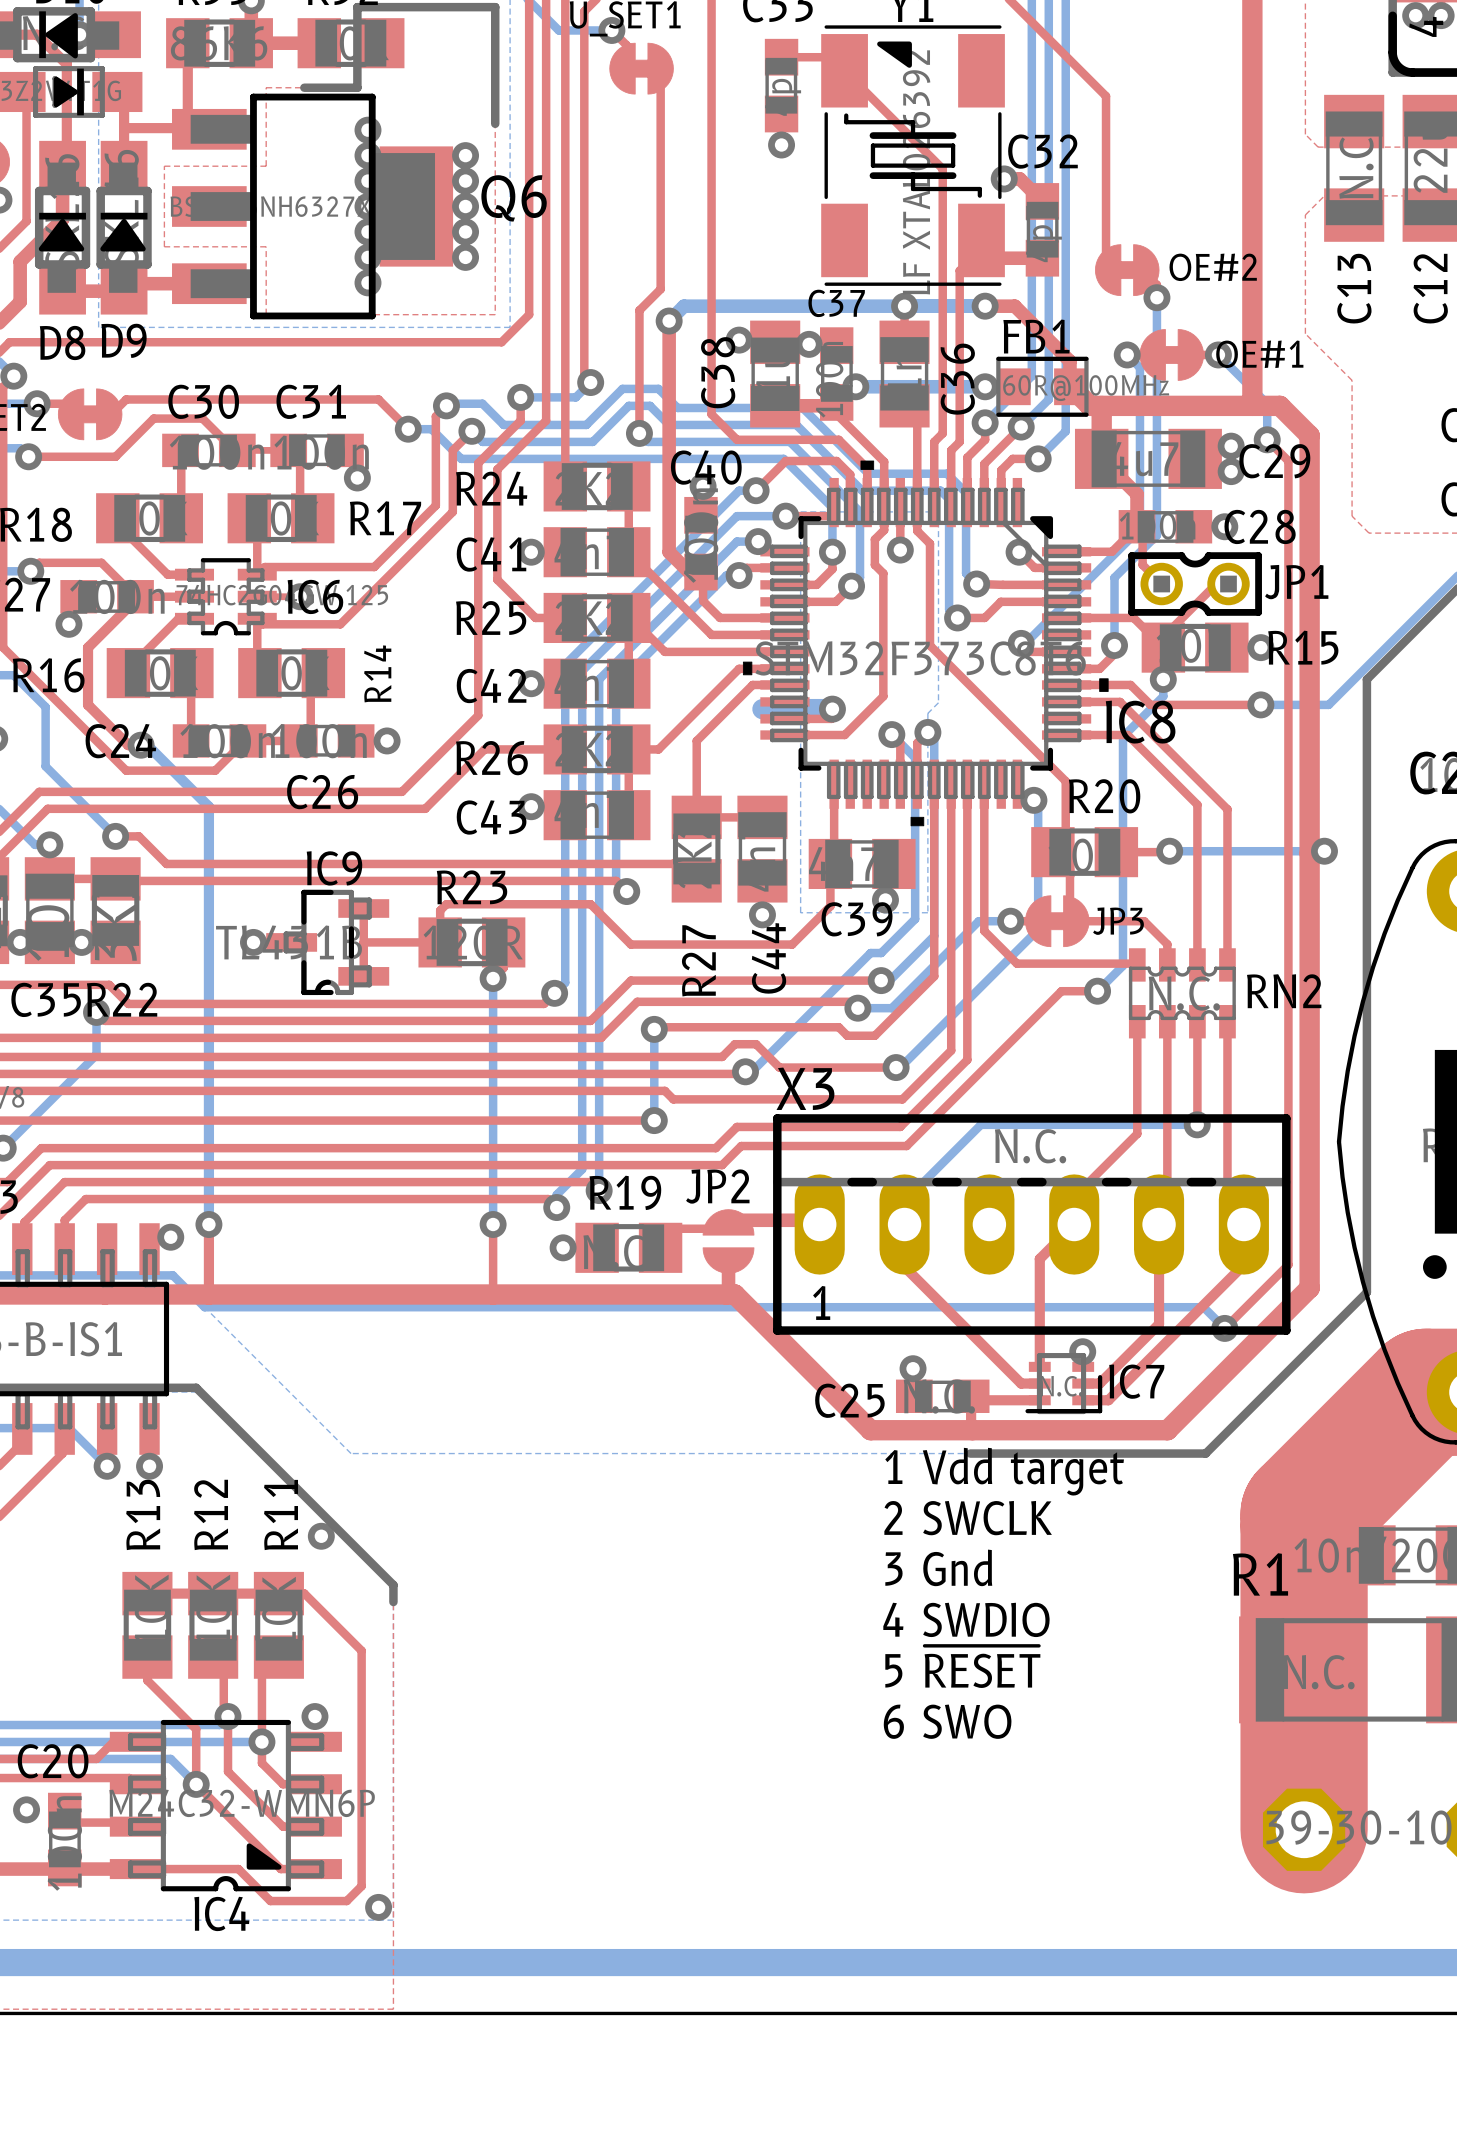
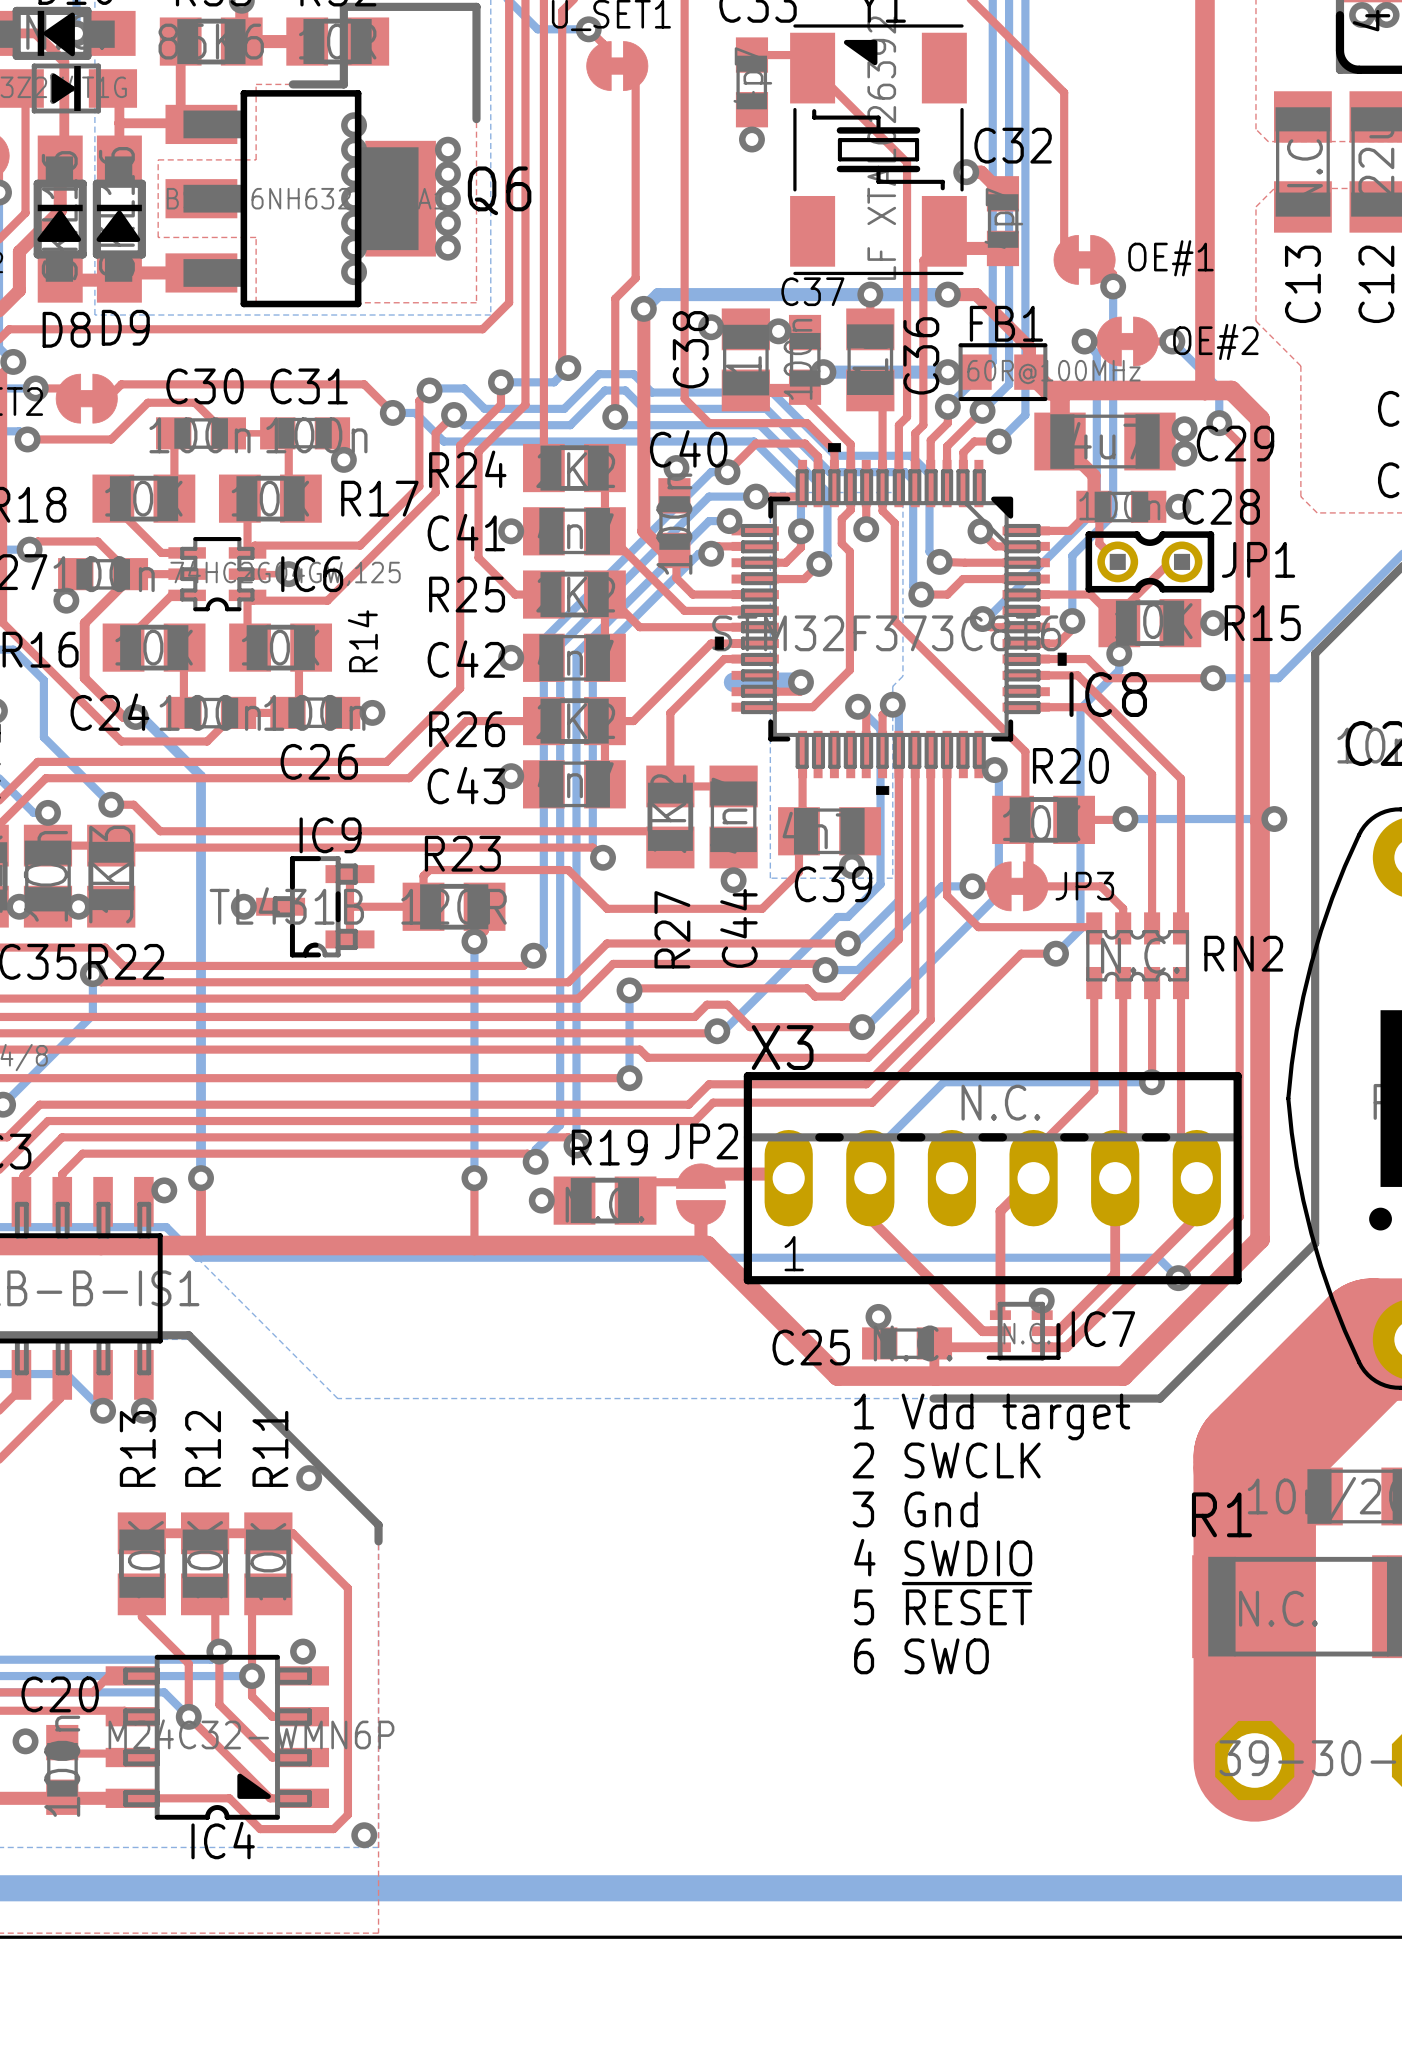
OE#2 name: OE#2 (1213, 267) -> OE#1 (1170, 258)
OE#1 name: OE#1 (1259, 354) -> OE#2 (1215, 341)

